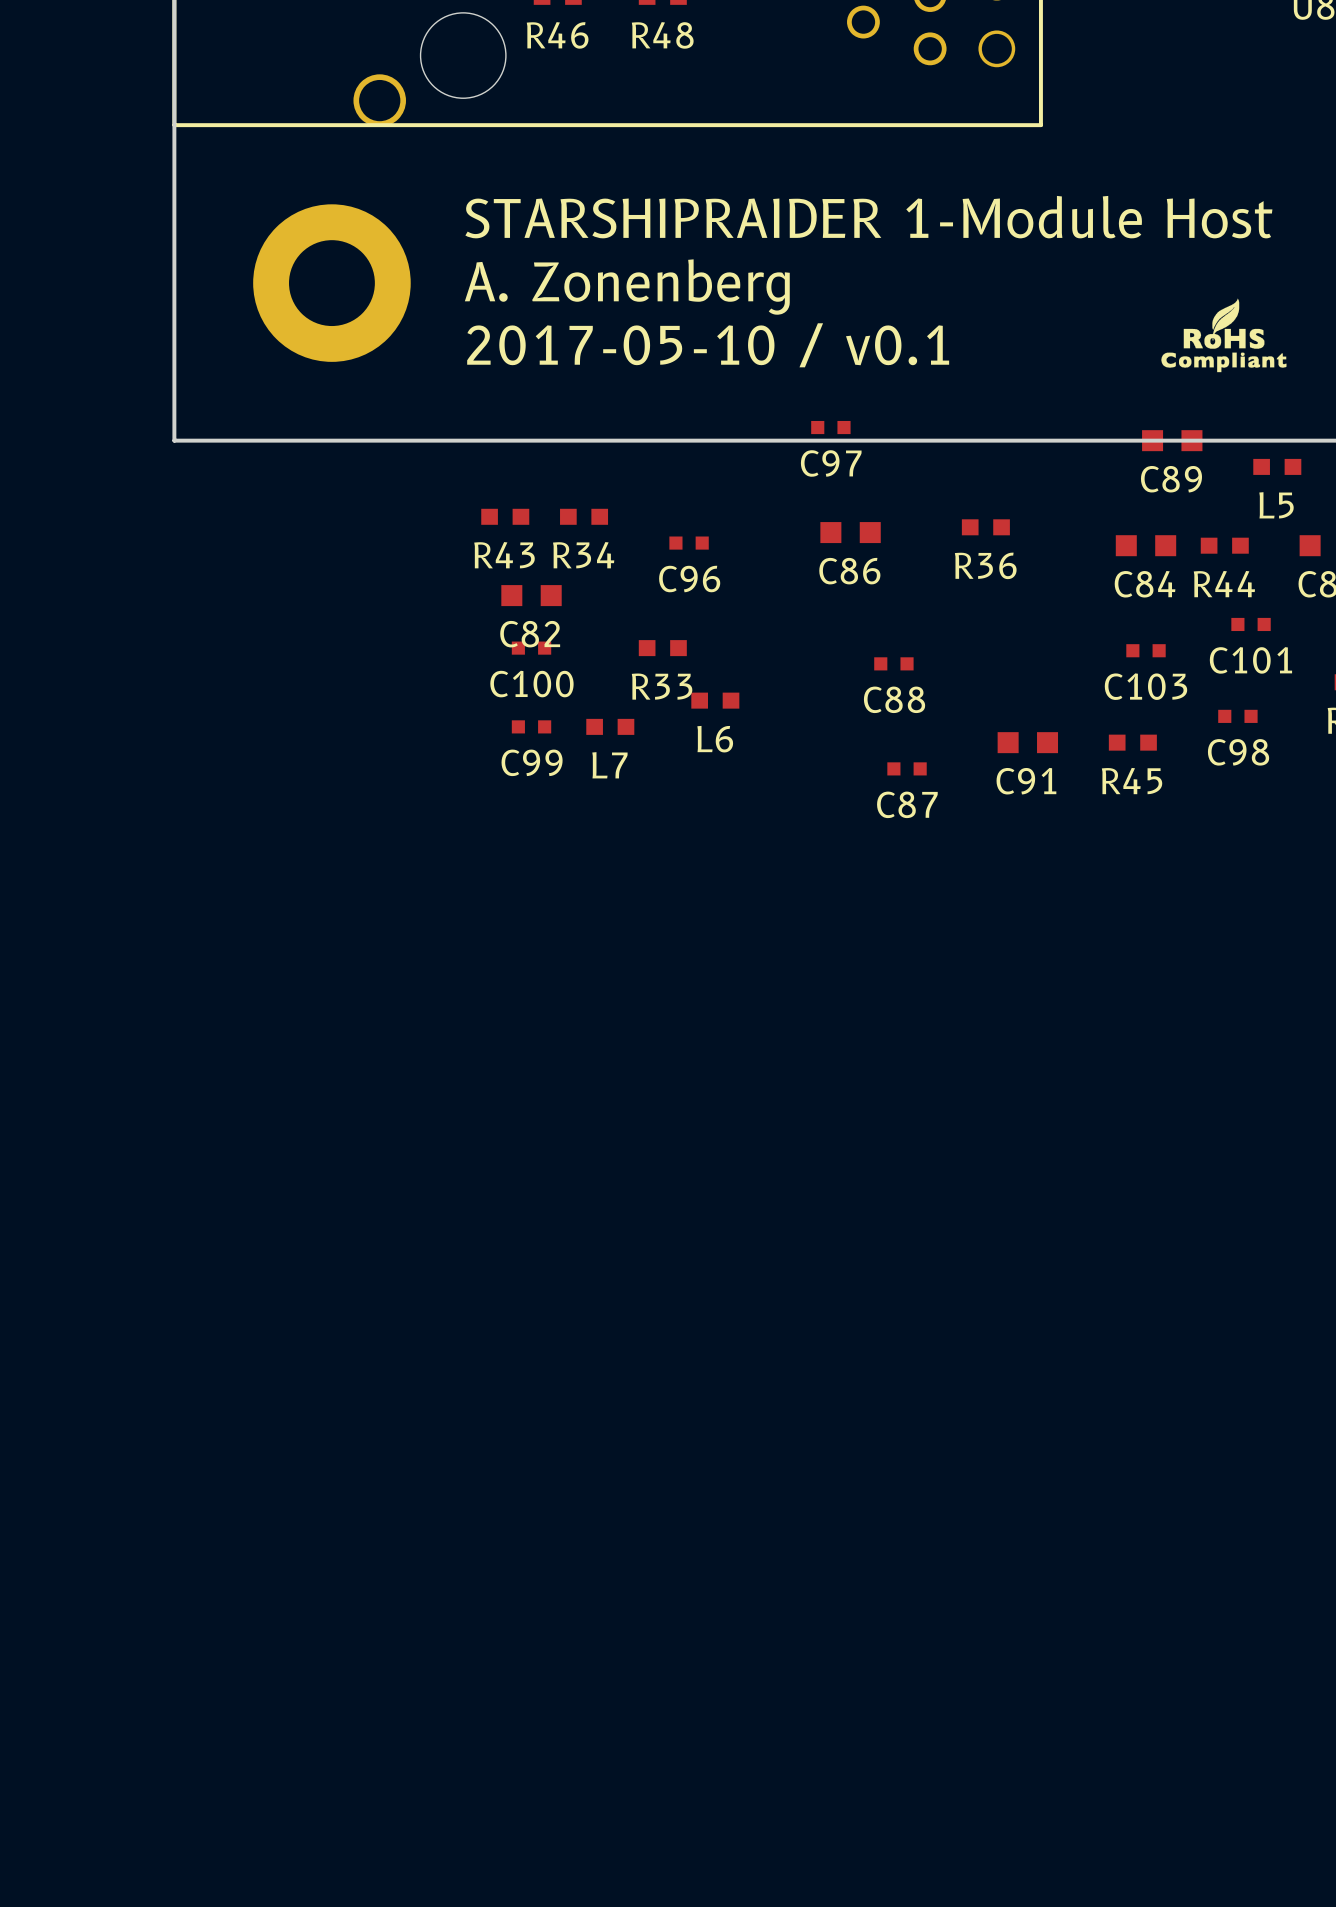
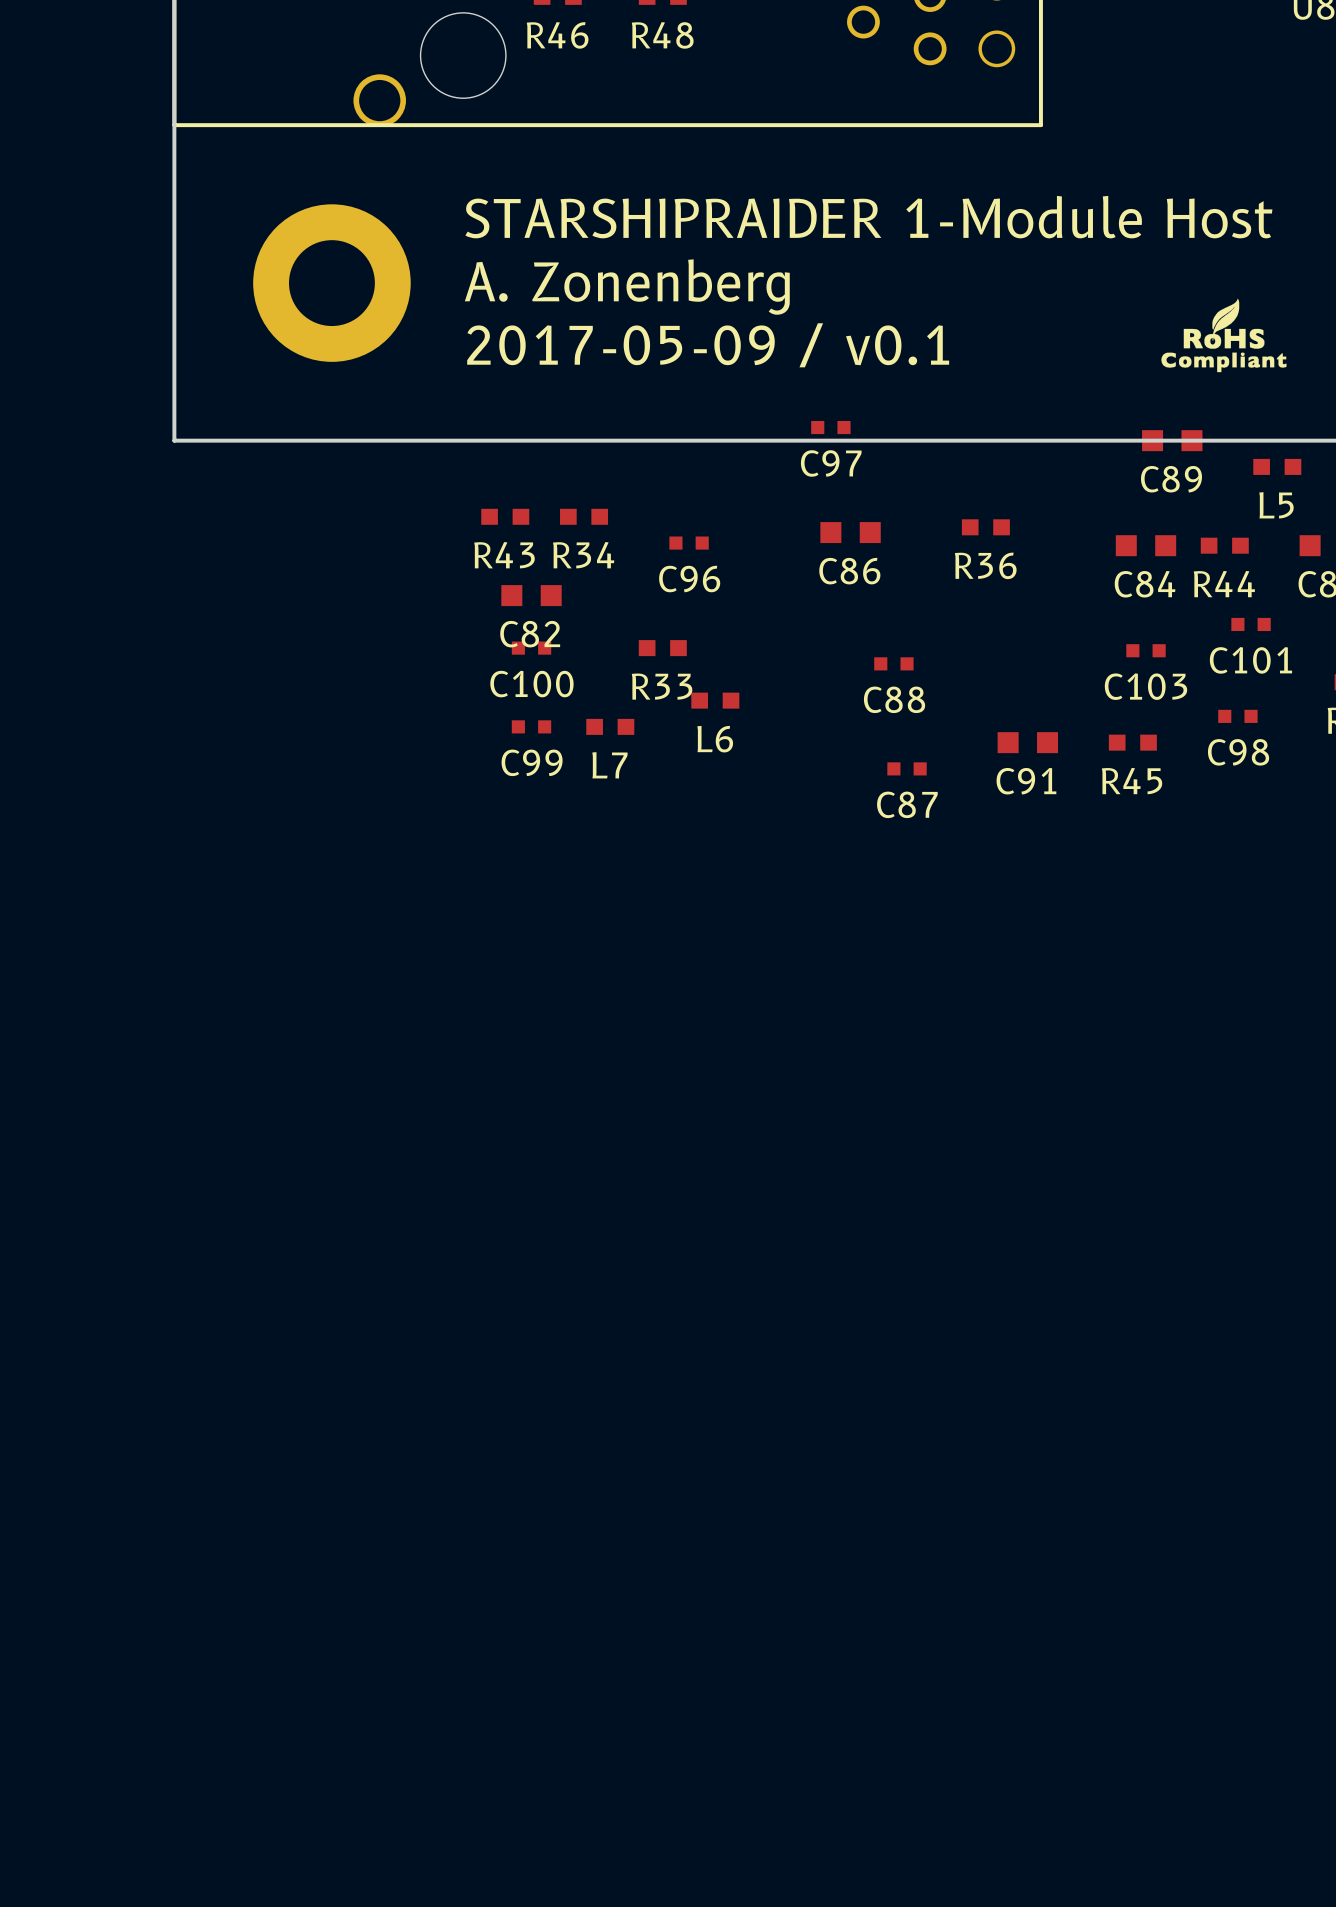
text: 2017-05-10 / v0.1 (708, 345) -> 2017-05-09 / v0.1 (708, 345)

